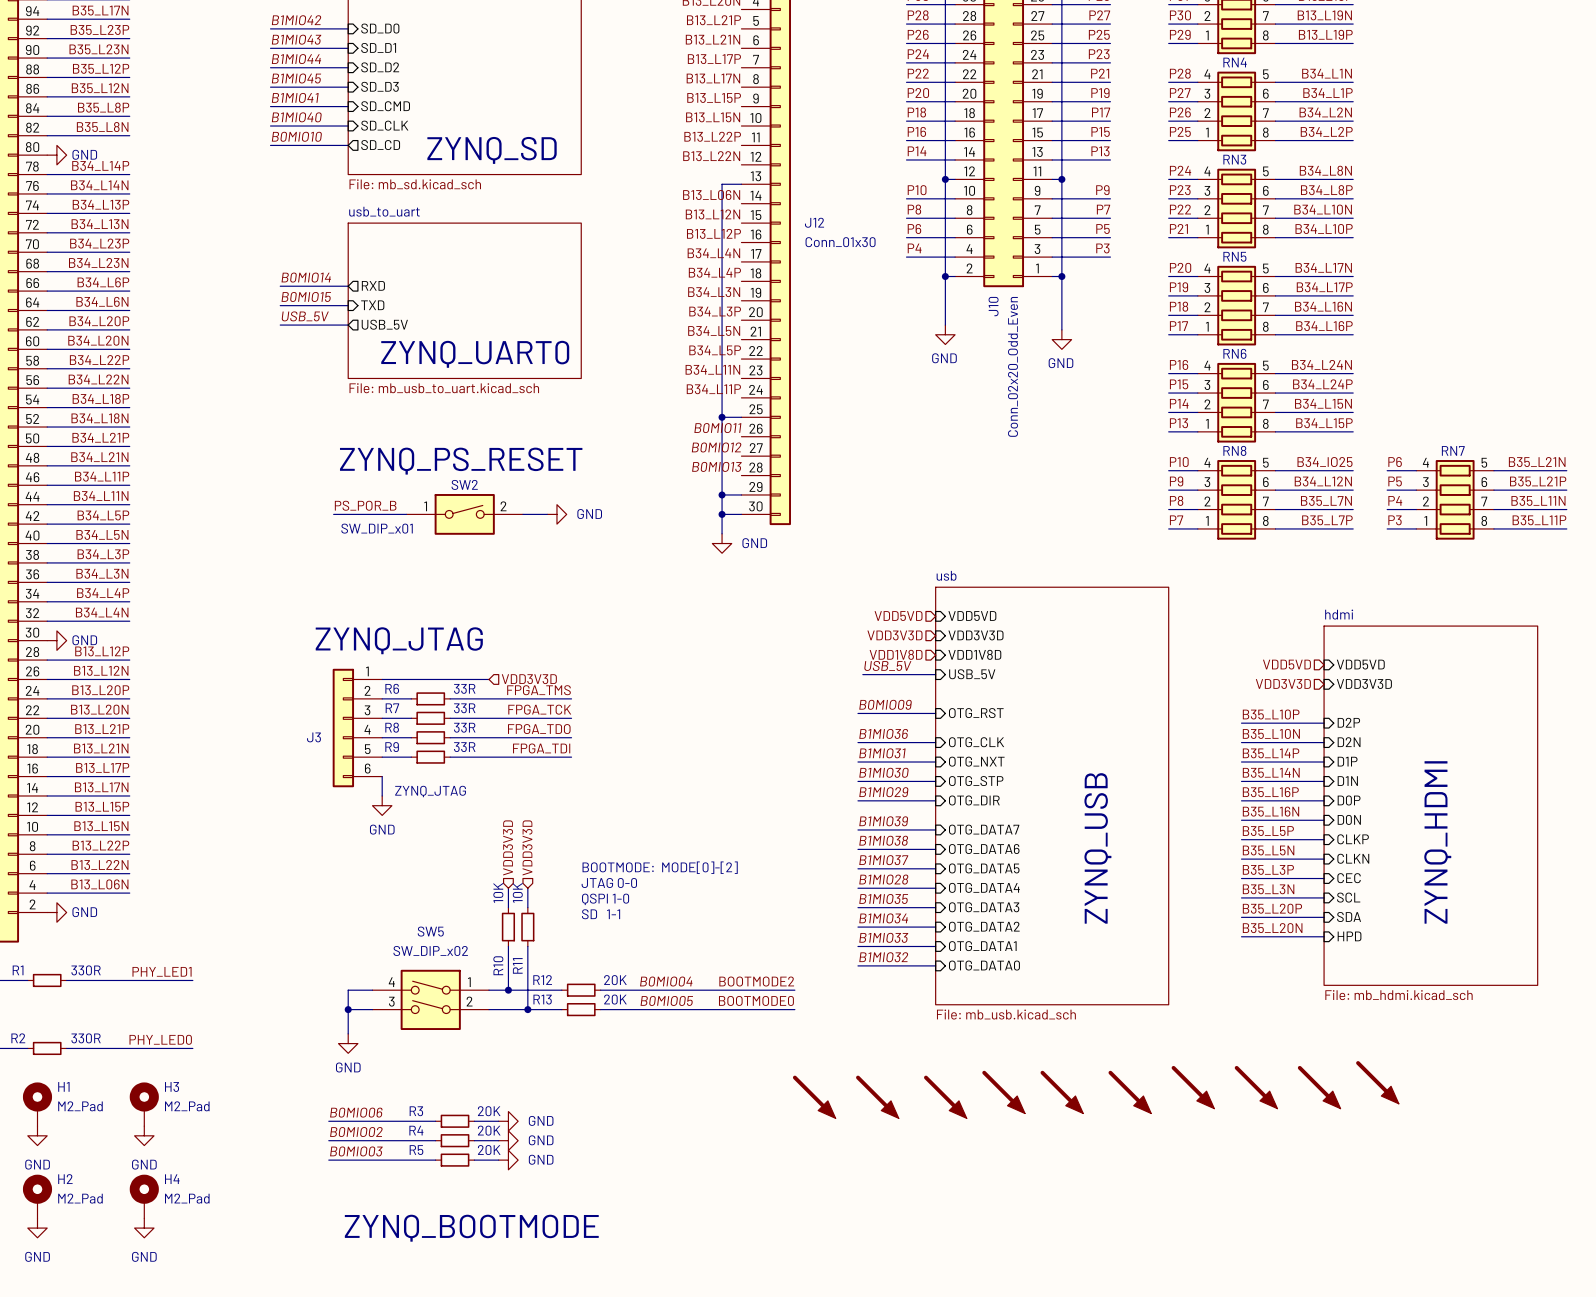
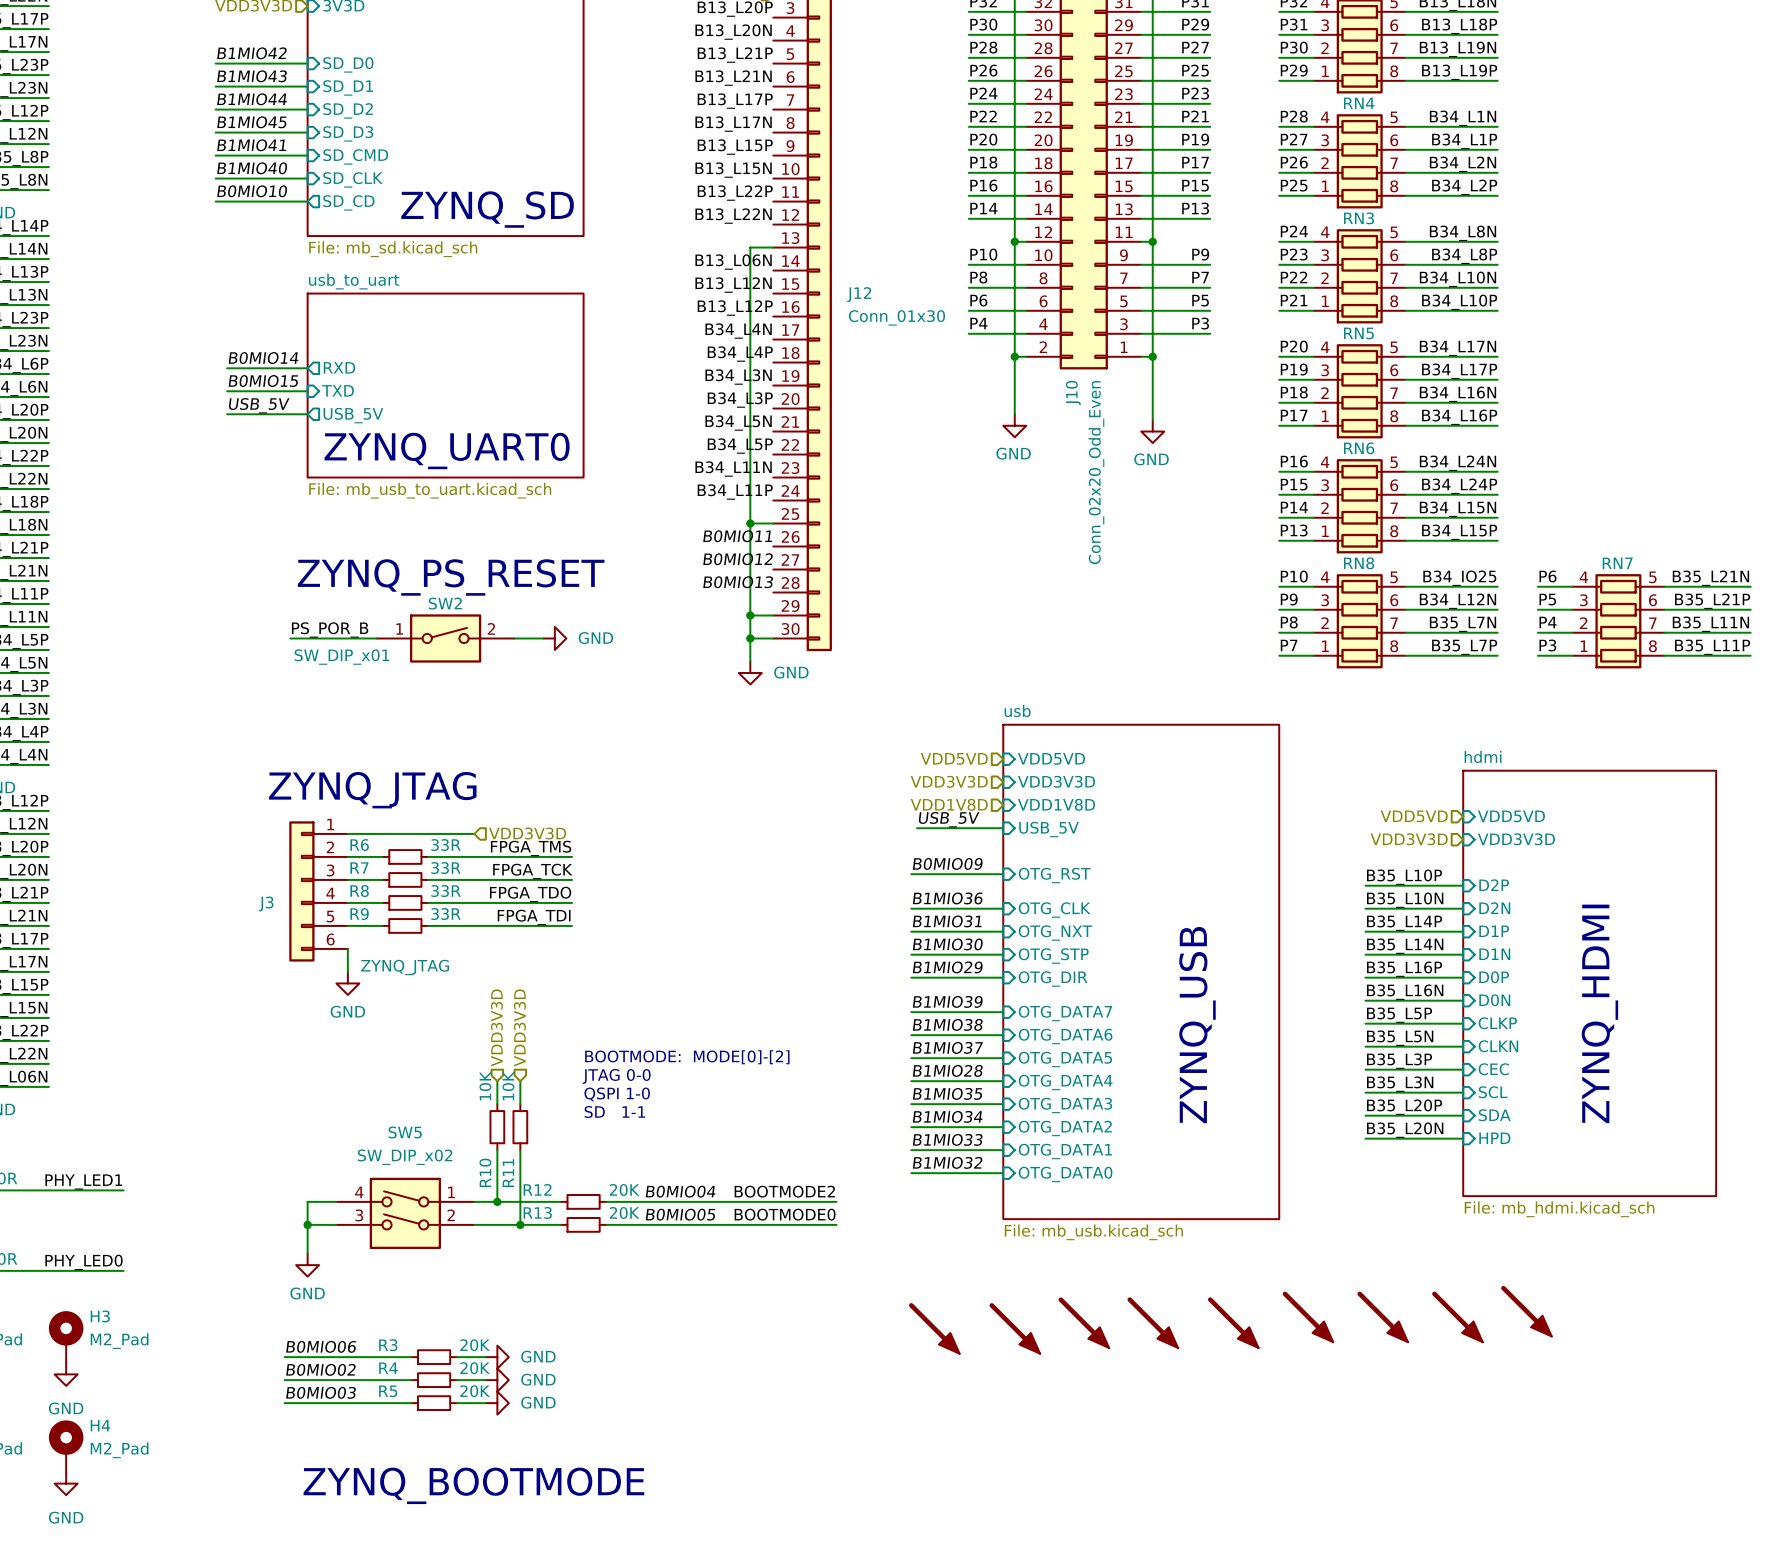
part: (814, 1096) -> none

